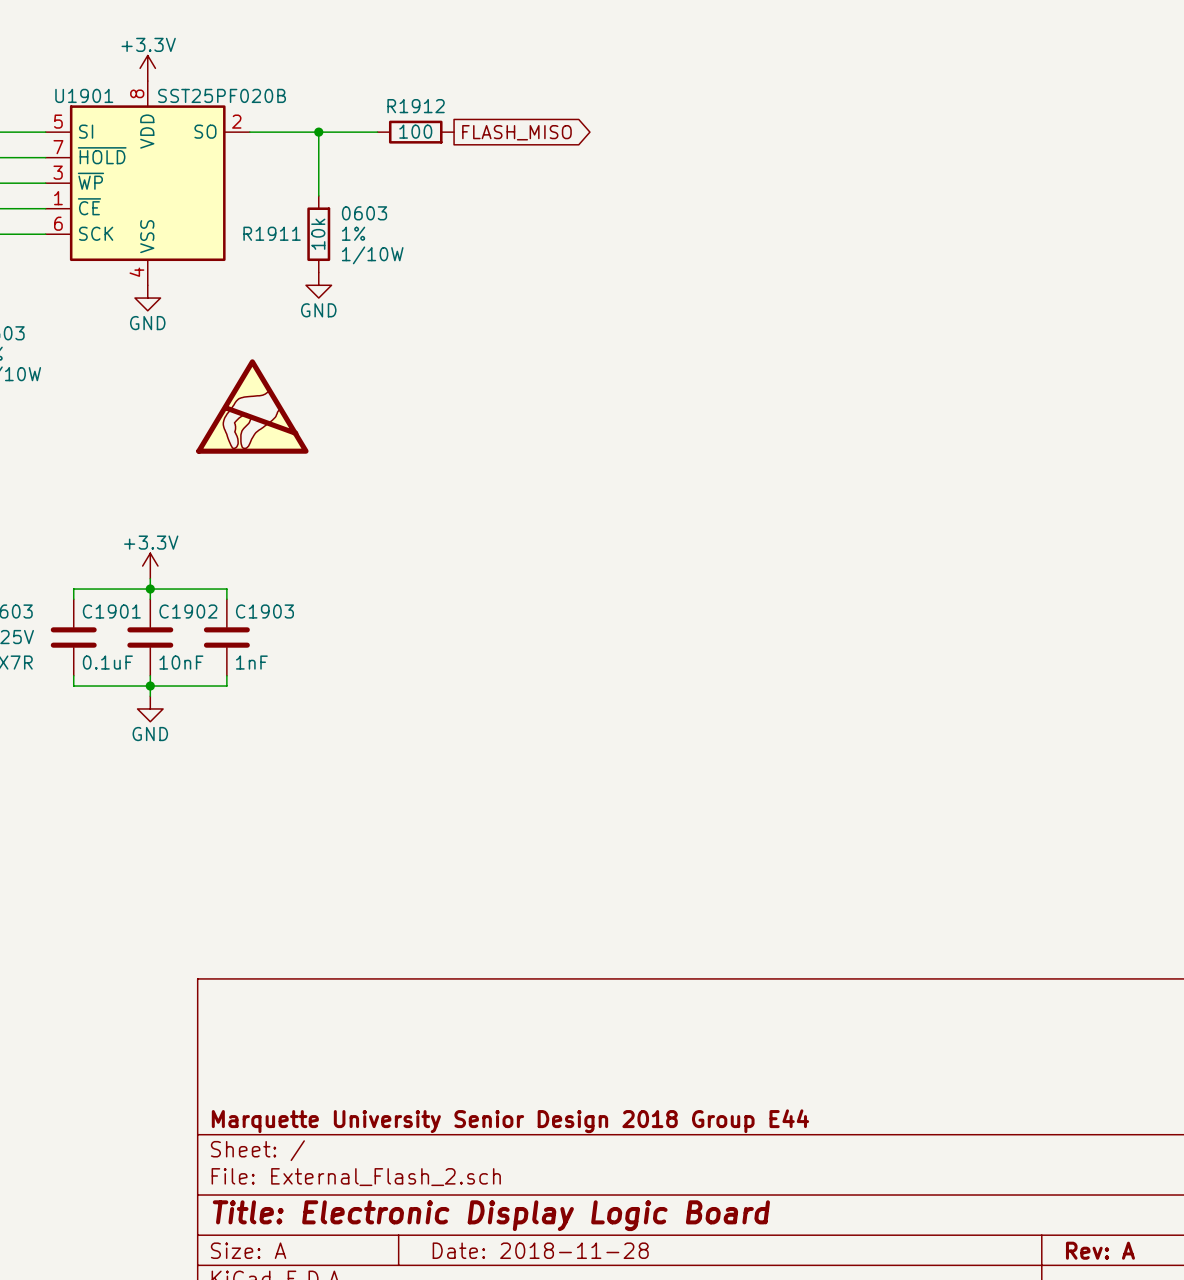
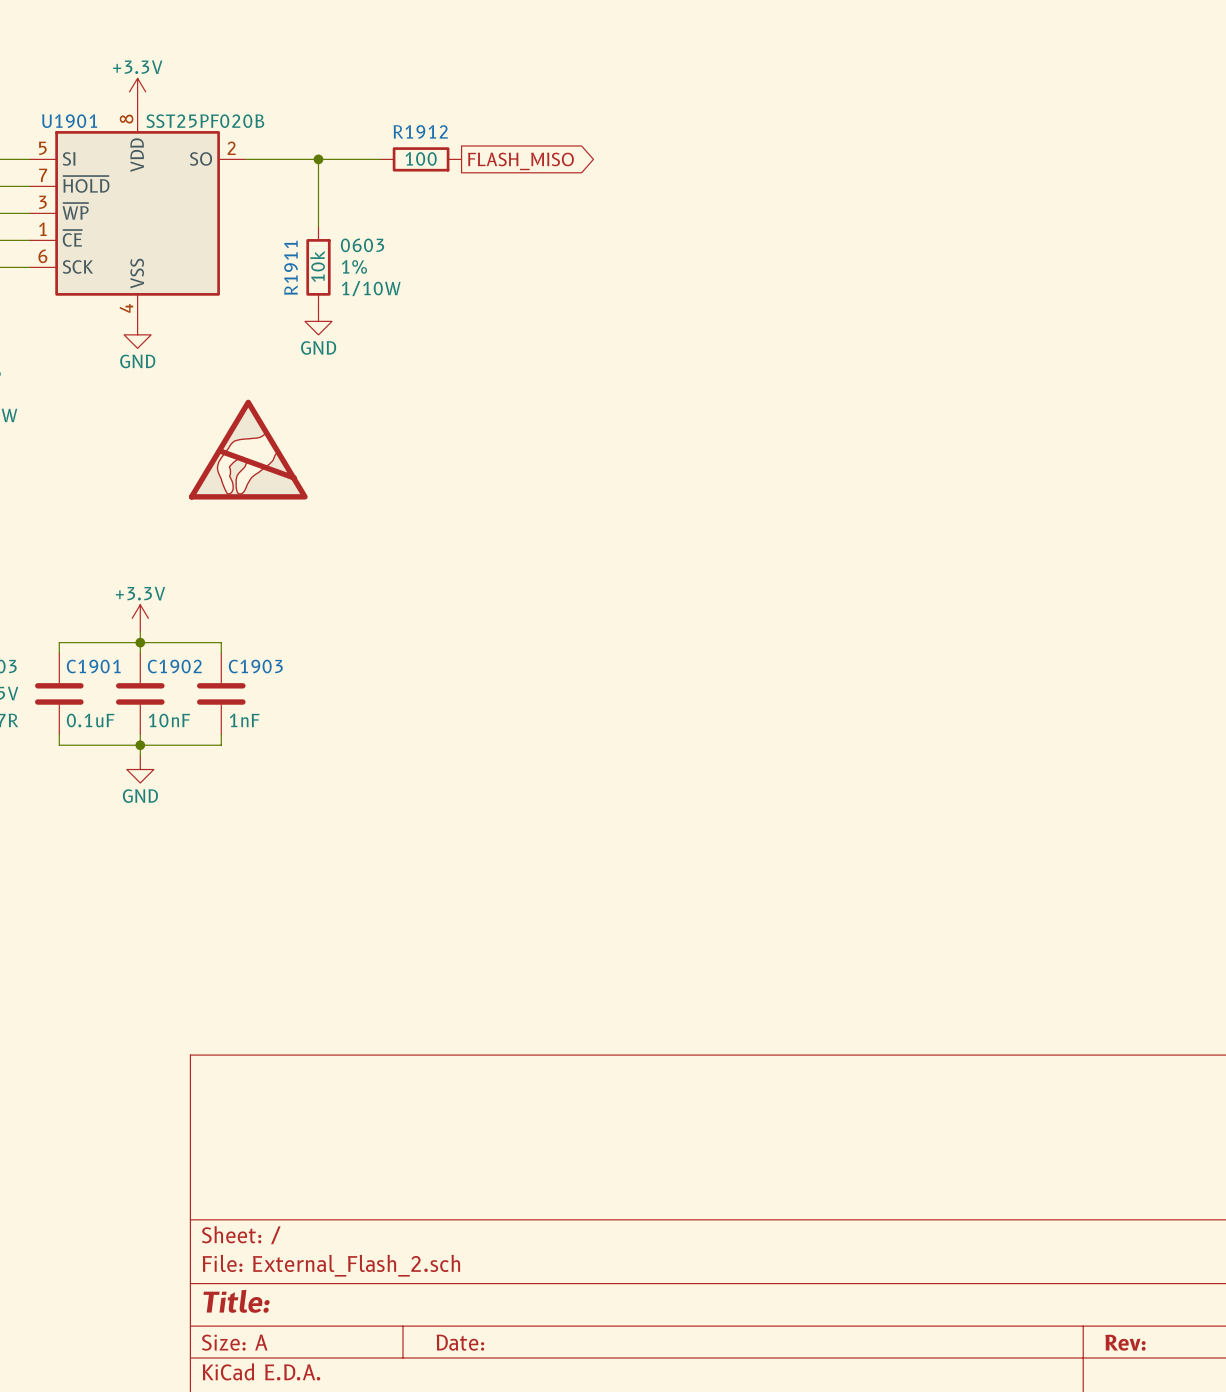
R1911 name rotation: 0° (272, 233) -> 90° counterclockwise (291, 267)
title block: Marquette University Senior Design 2018 Group E44 (510, 1121) -> none
title block: Title: Electronic Display Logic Board (491, 1215) -> Title: (236, 1301)
title block: Date: 2018-11-28 (540, 1250) -> Date: (460, 1342)
title block: Rev: A (1100, 1250) -> Rev: (1125, 1342)

